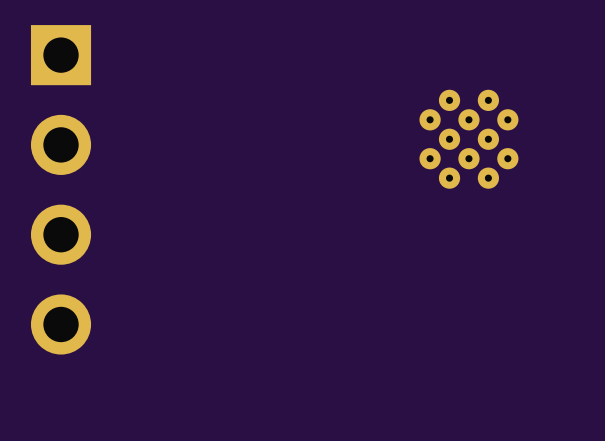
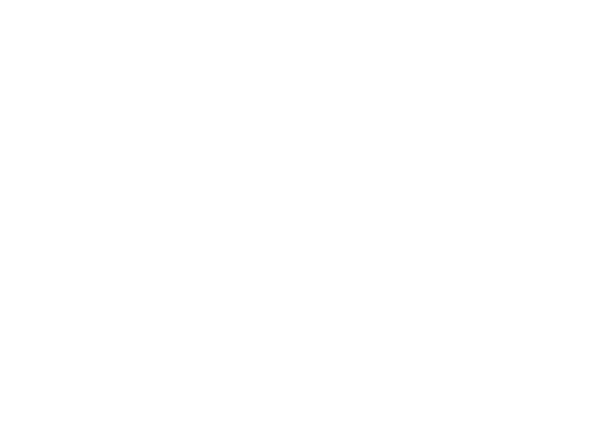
part: (468, 139) -> none
part: (61, 189) -> none

